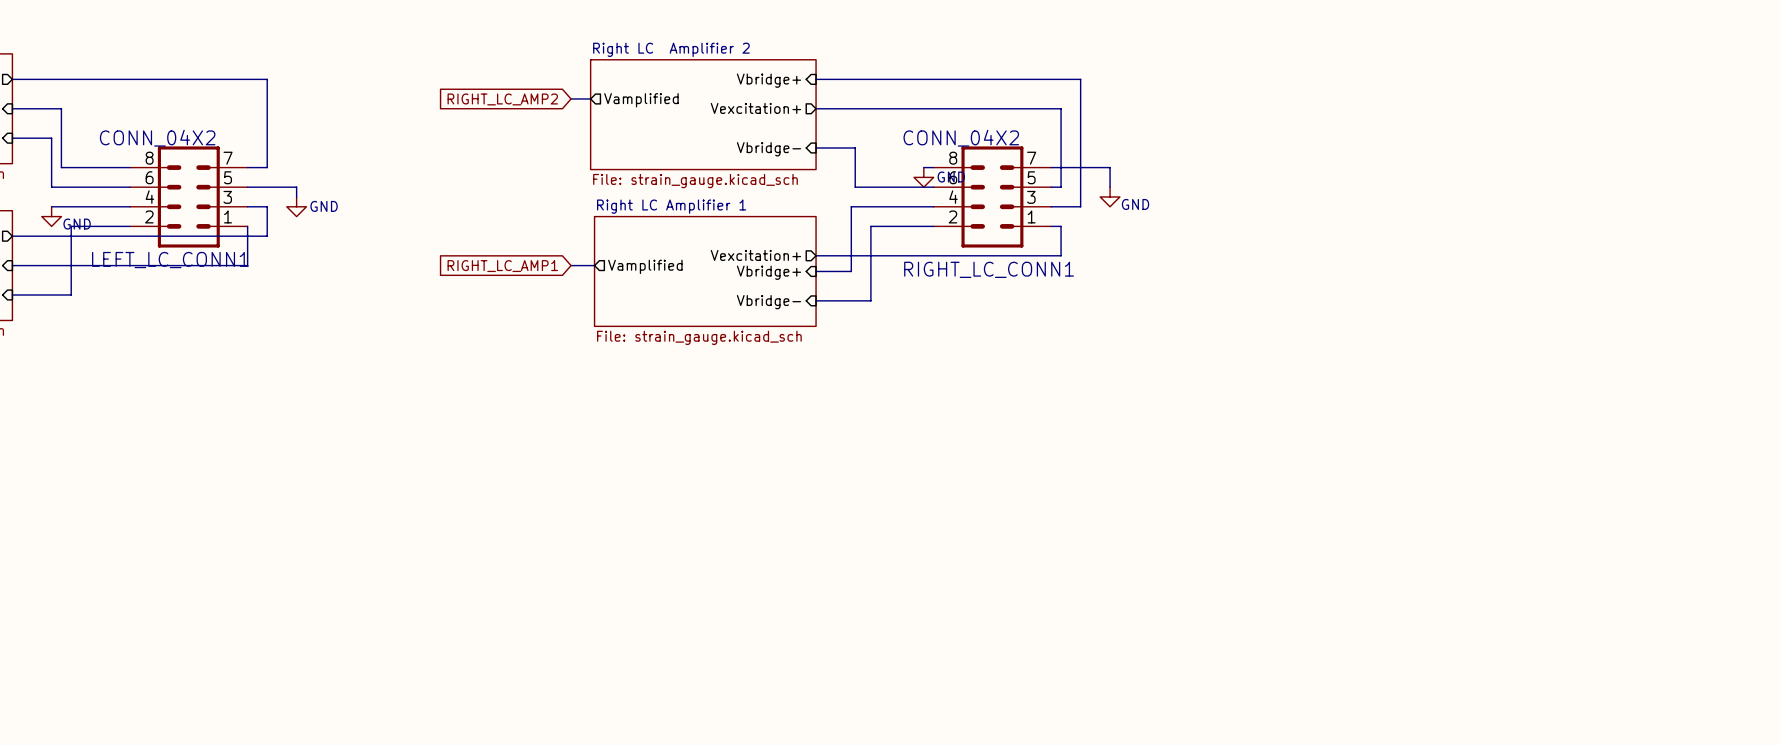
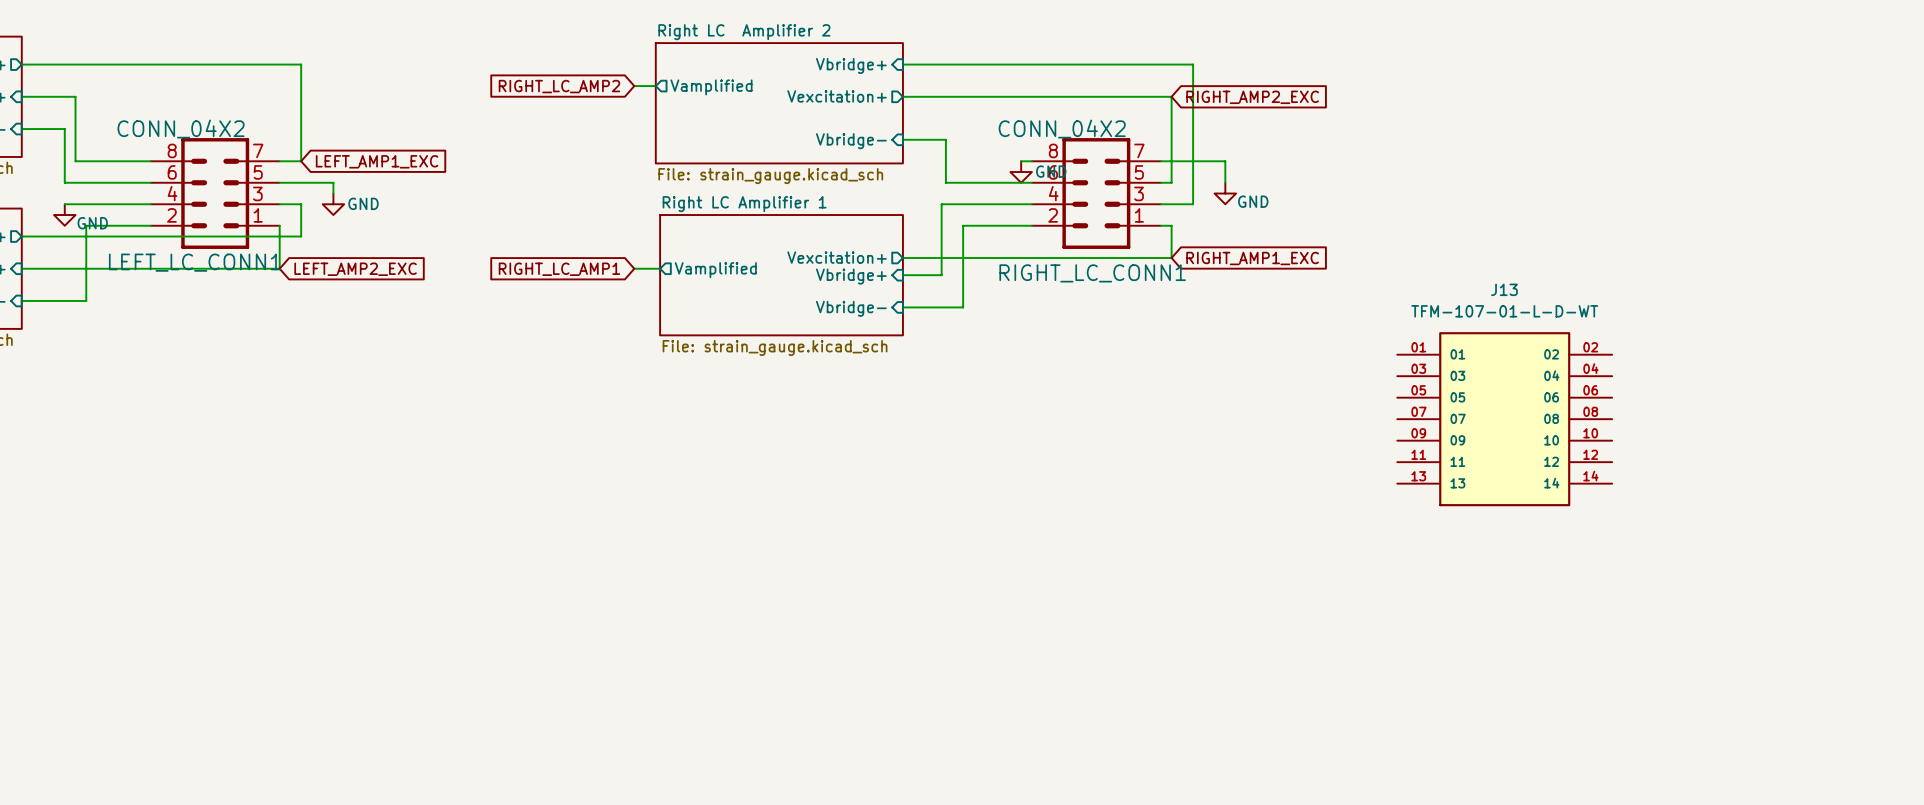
global label: none -> RIGHT_AMP2_EXC (1252, 97)
global label: none -> LEFT_AMP1_EXC (377, 161)
global label: none -> RIGHT_AMP1_EXC (1252, 258)
global label: none -> LEFT_AMP2_EXC (355, 269)
J13: none -> TFM-107-01-L-D-WT (1504, 419)

